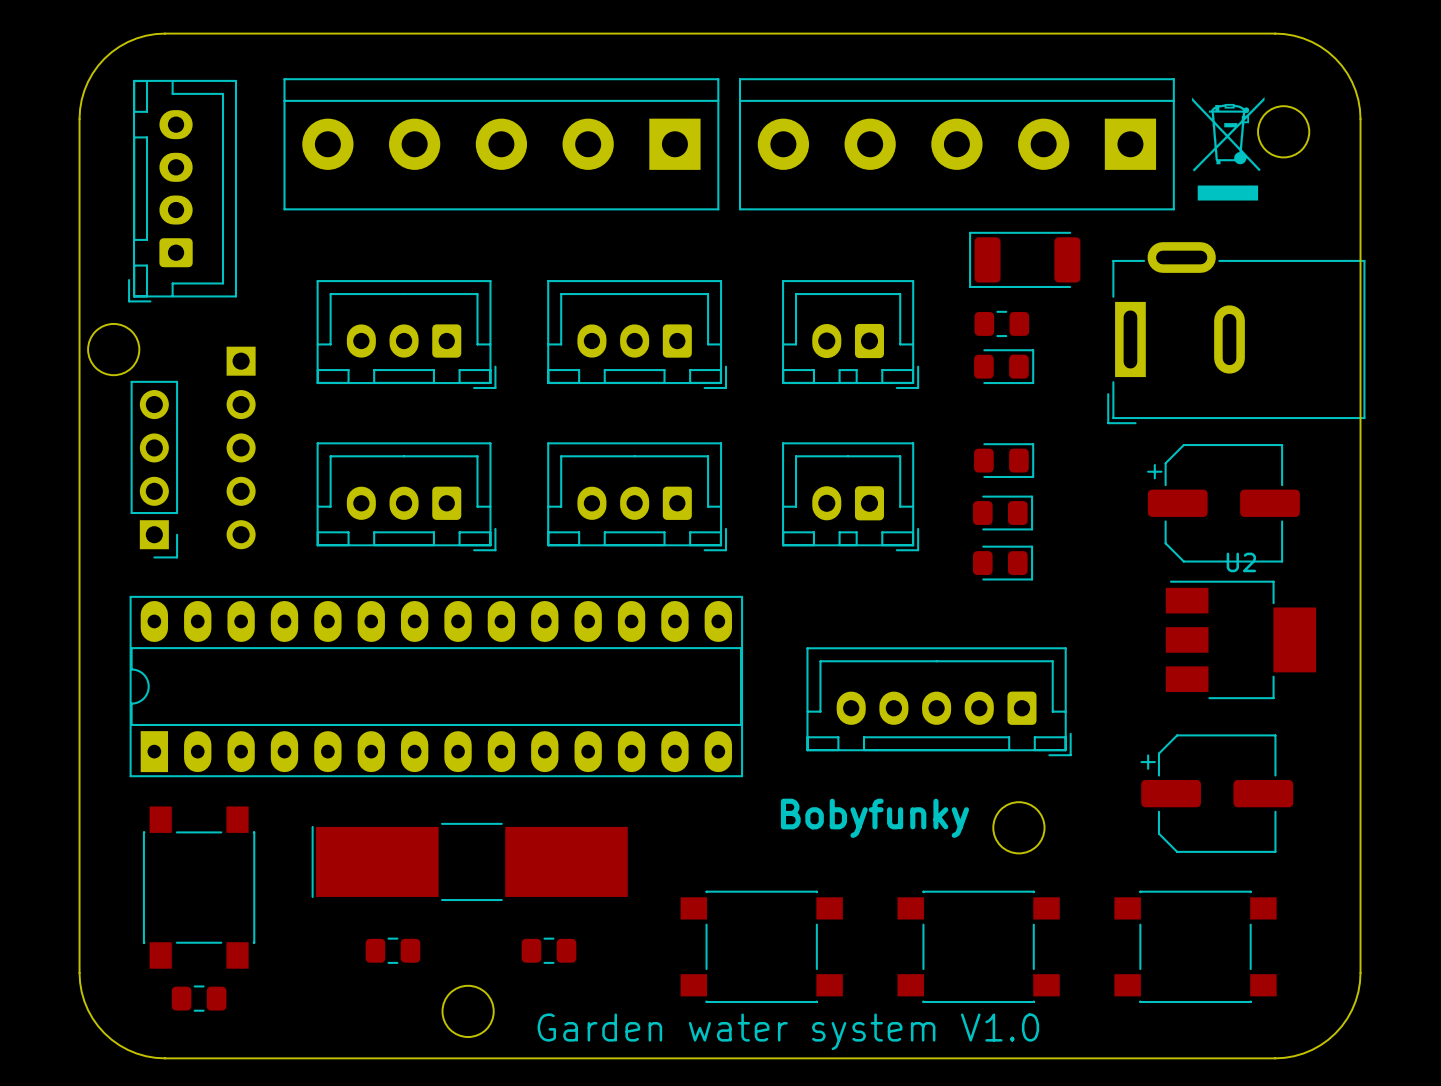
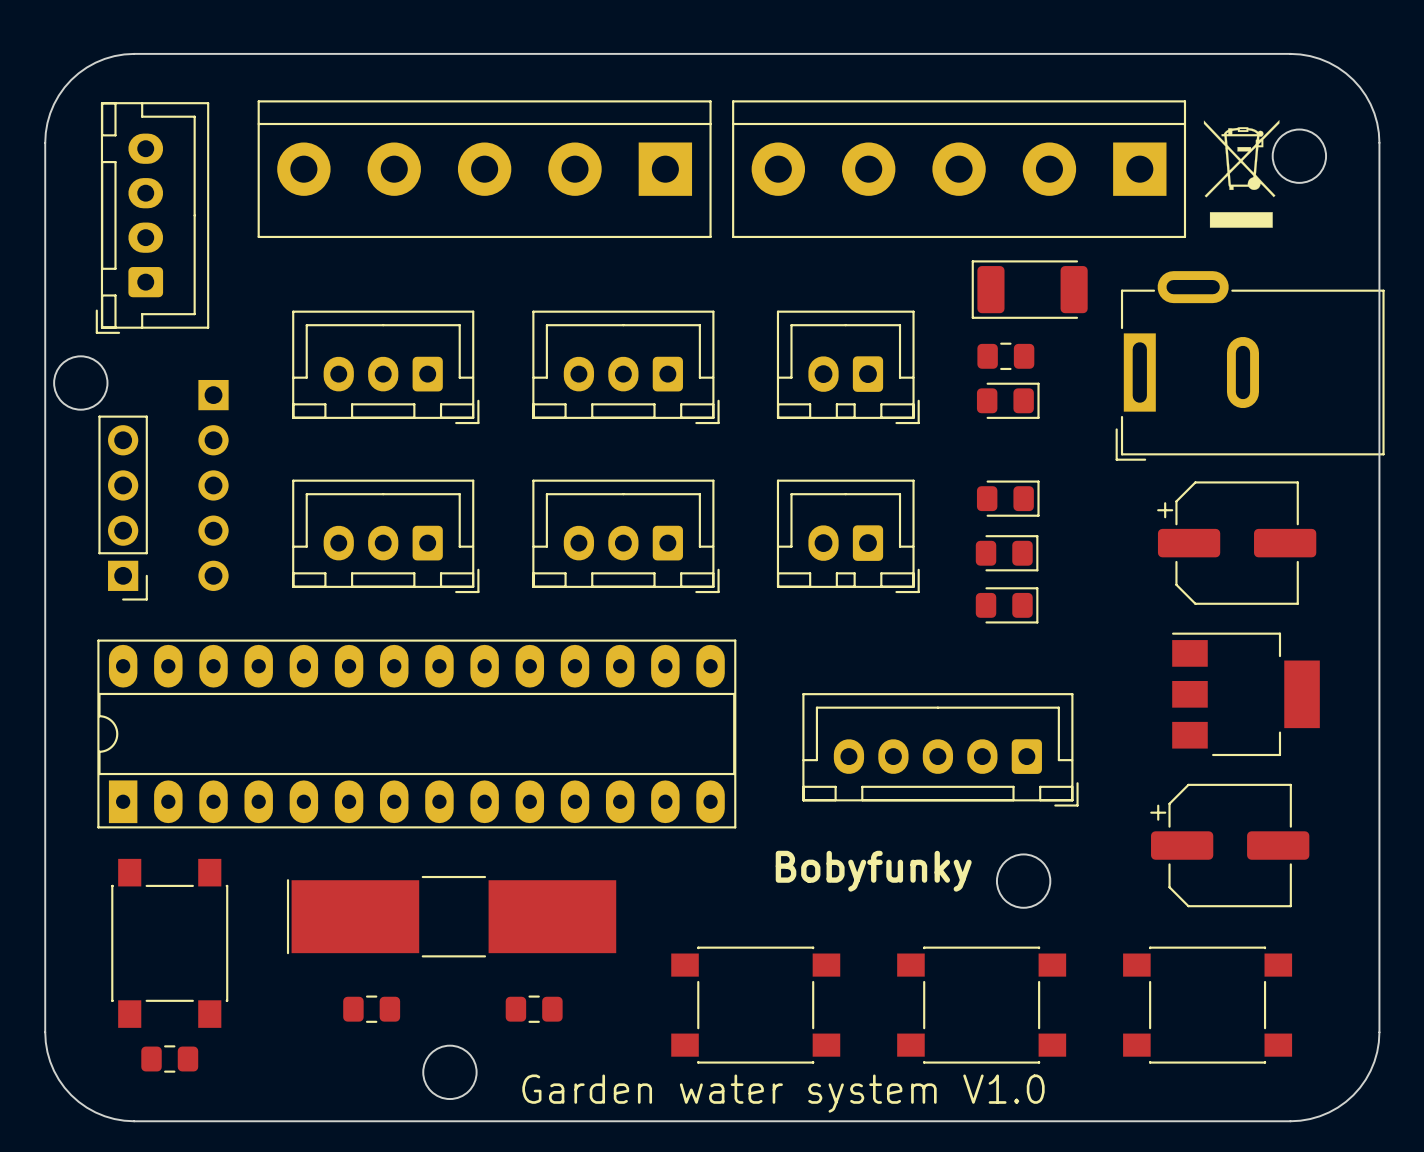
U2: (1240, 639) -> none
part: none -> (1245, 694)

